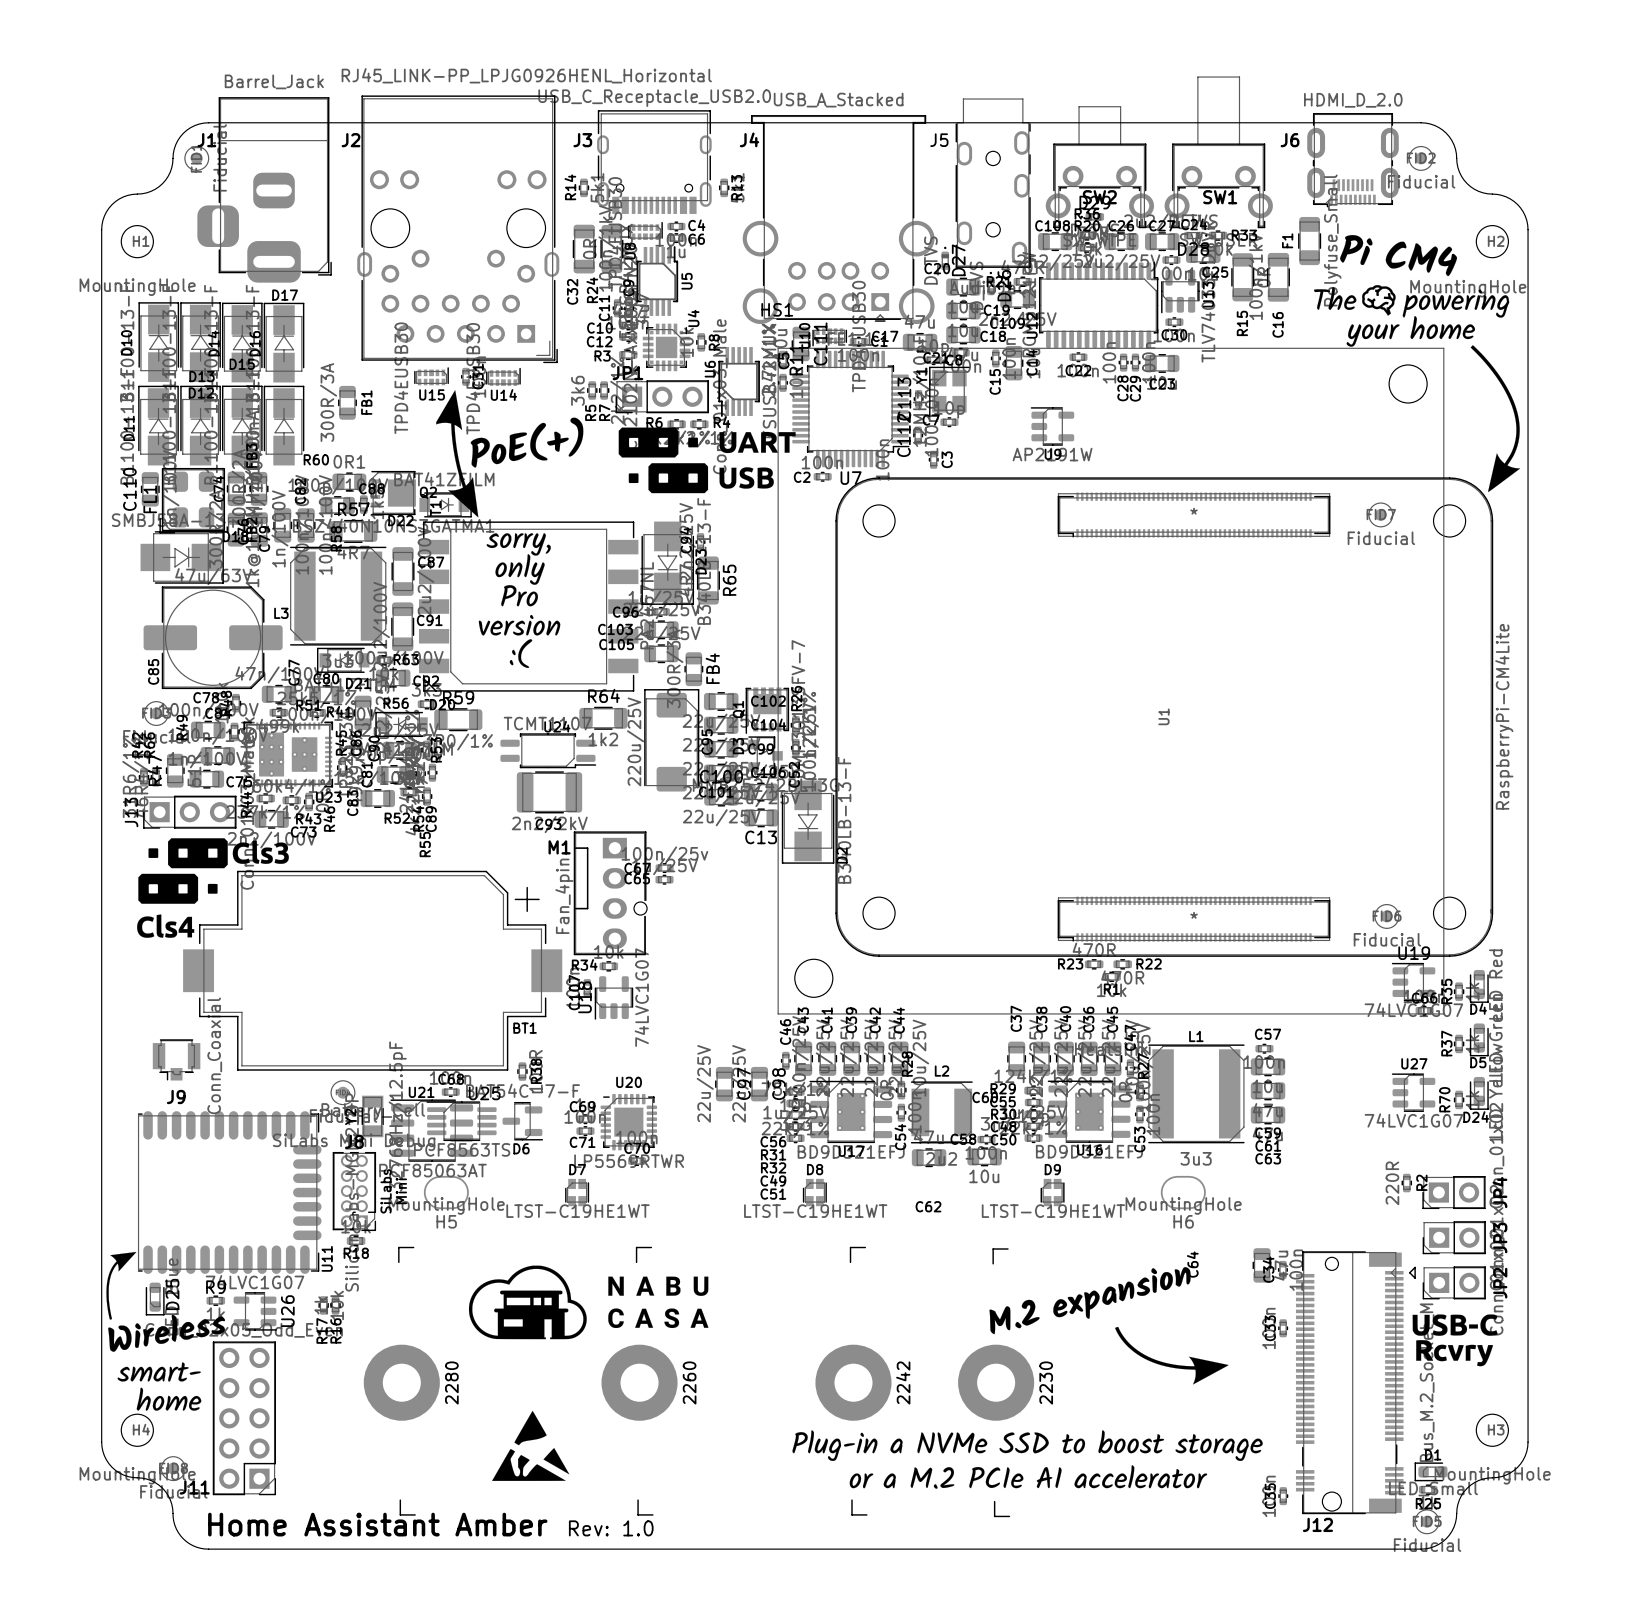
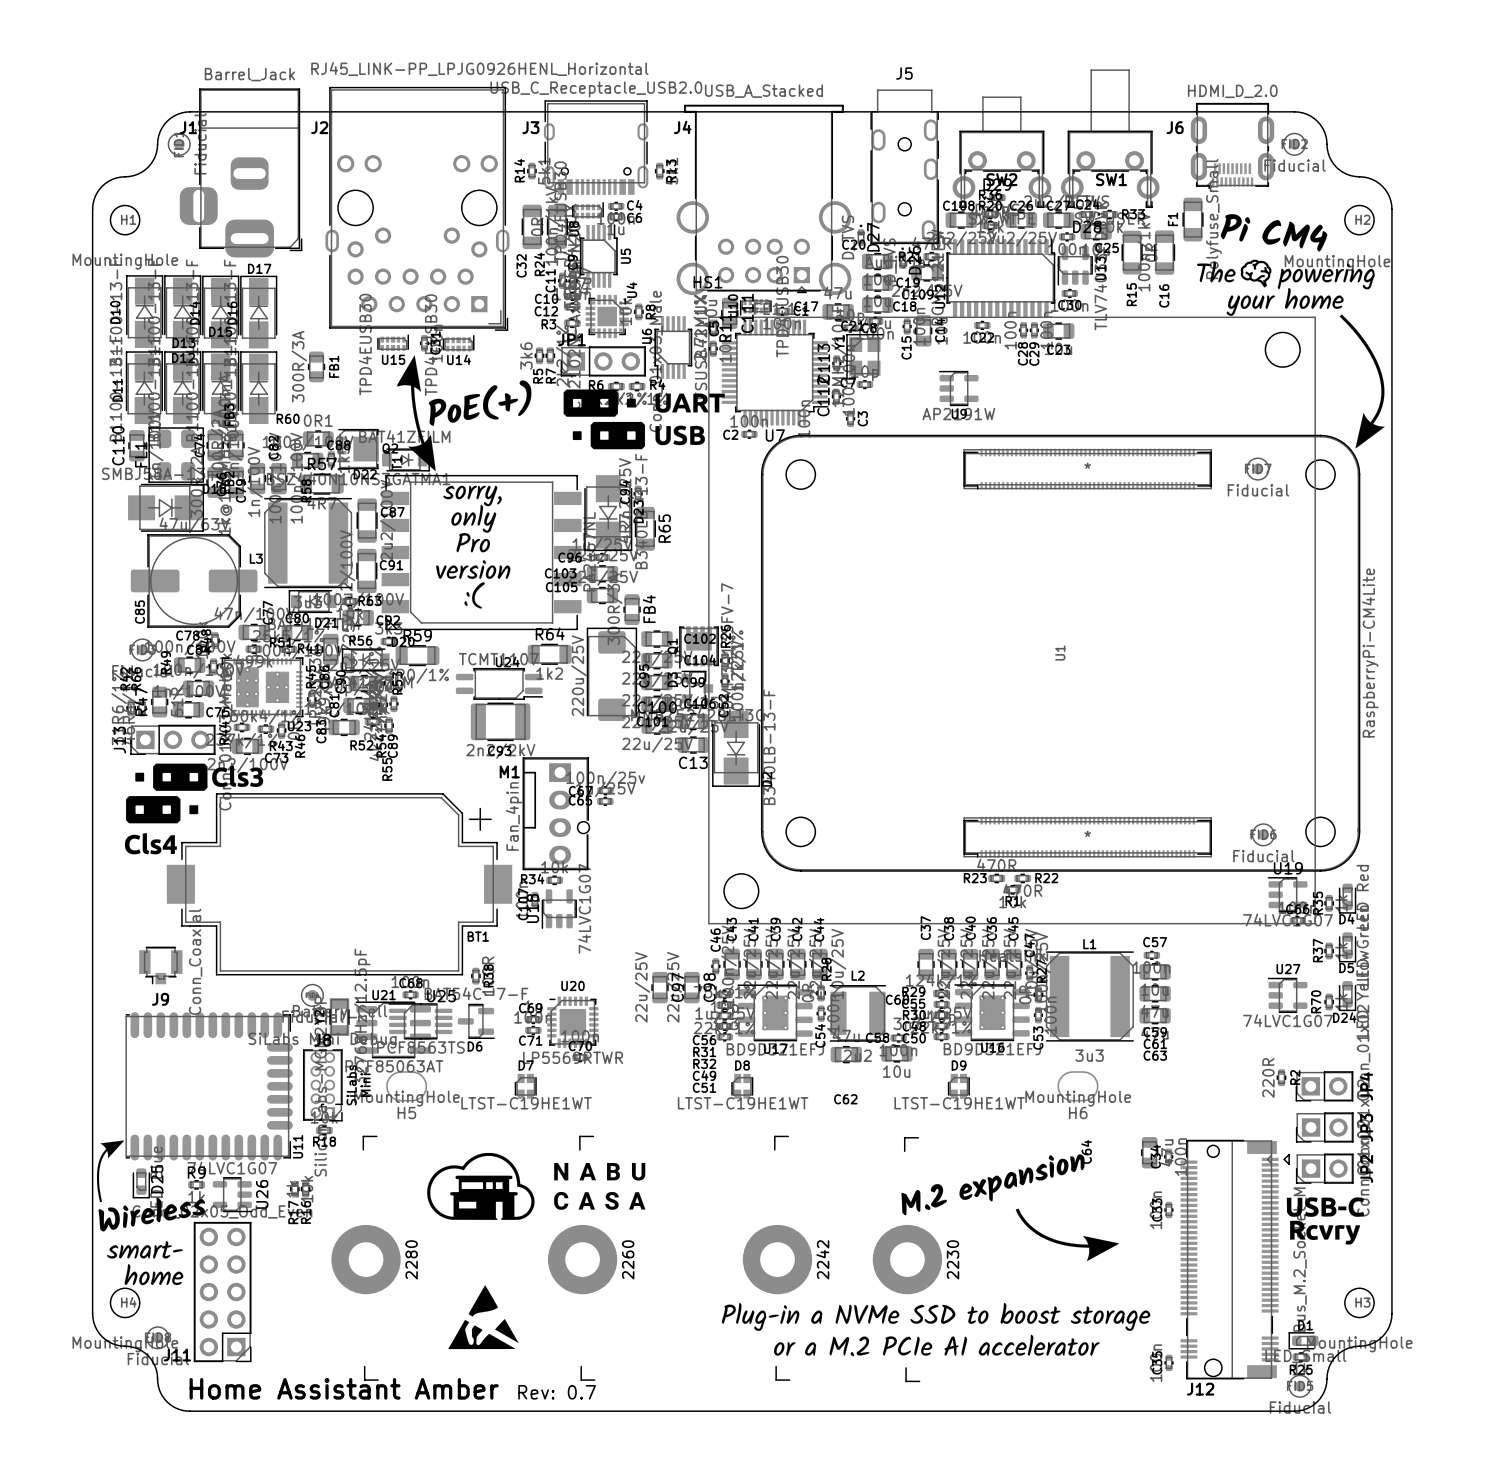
J5 name position: J5 (939, 140) -> J5 (904, 73)
FL1 footprint: [159, 467, 226, 534] -> [148, 427, 204, 483]
text: Rev: 1.0 (611, 1528) -> Rev: 0.7 (557, 1392)

